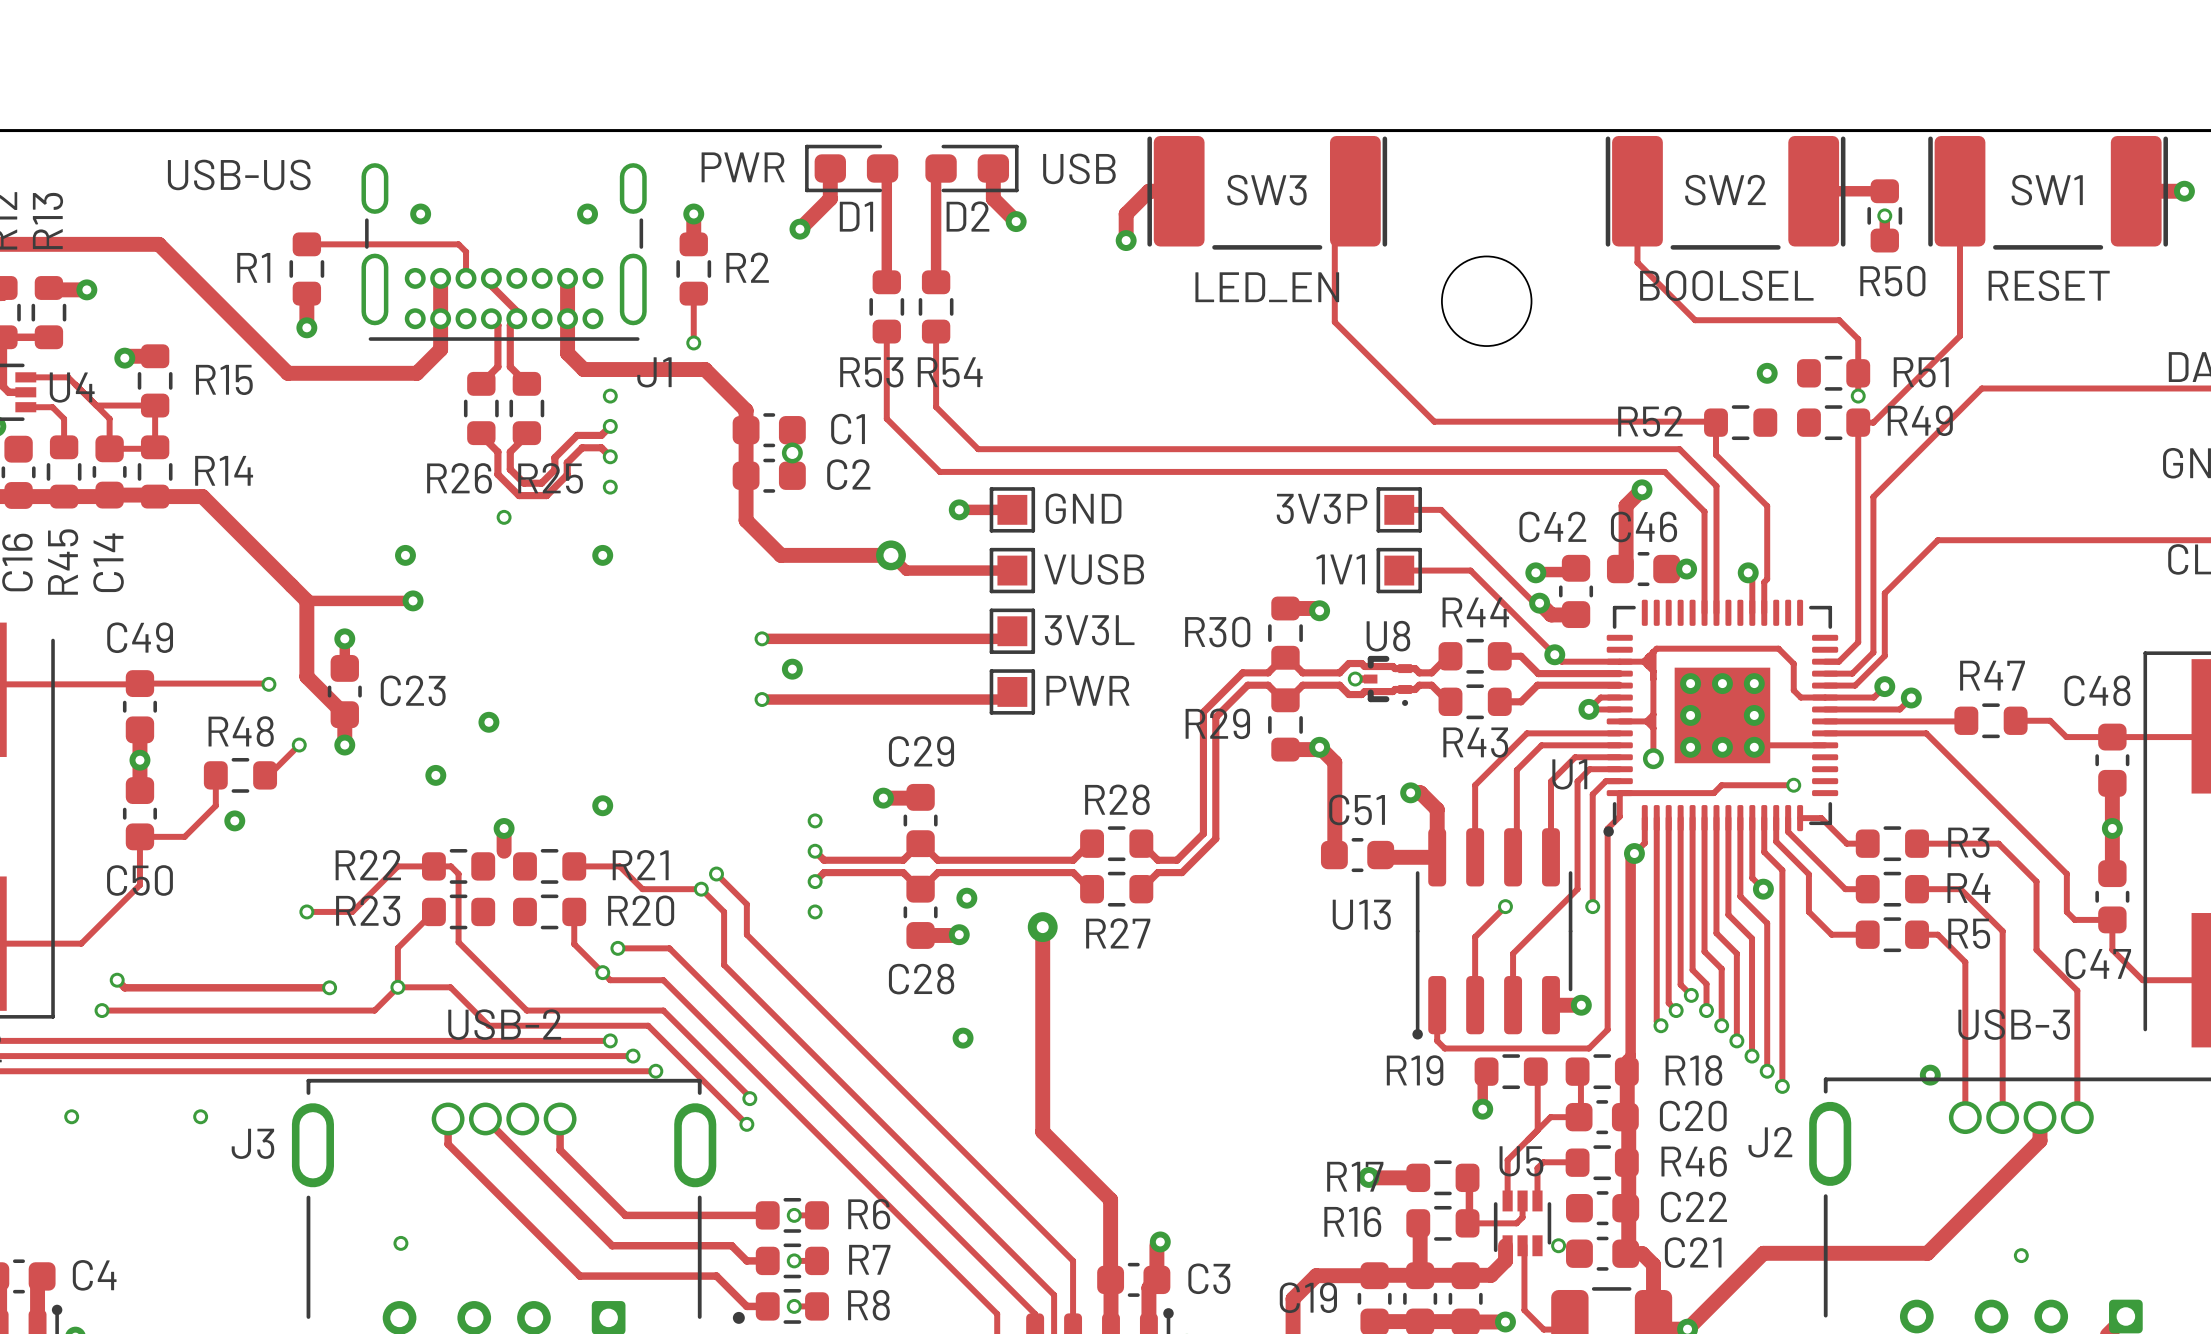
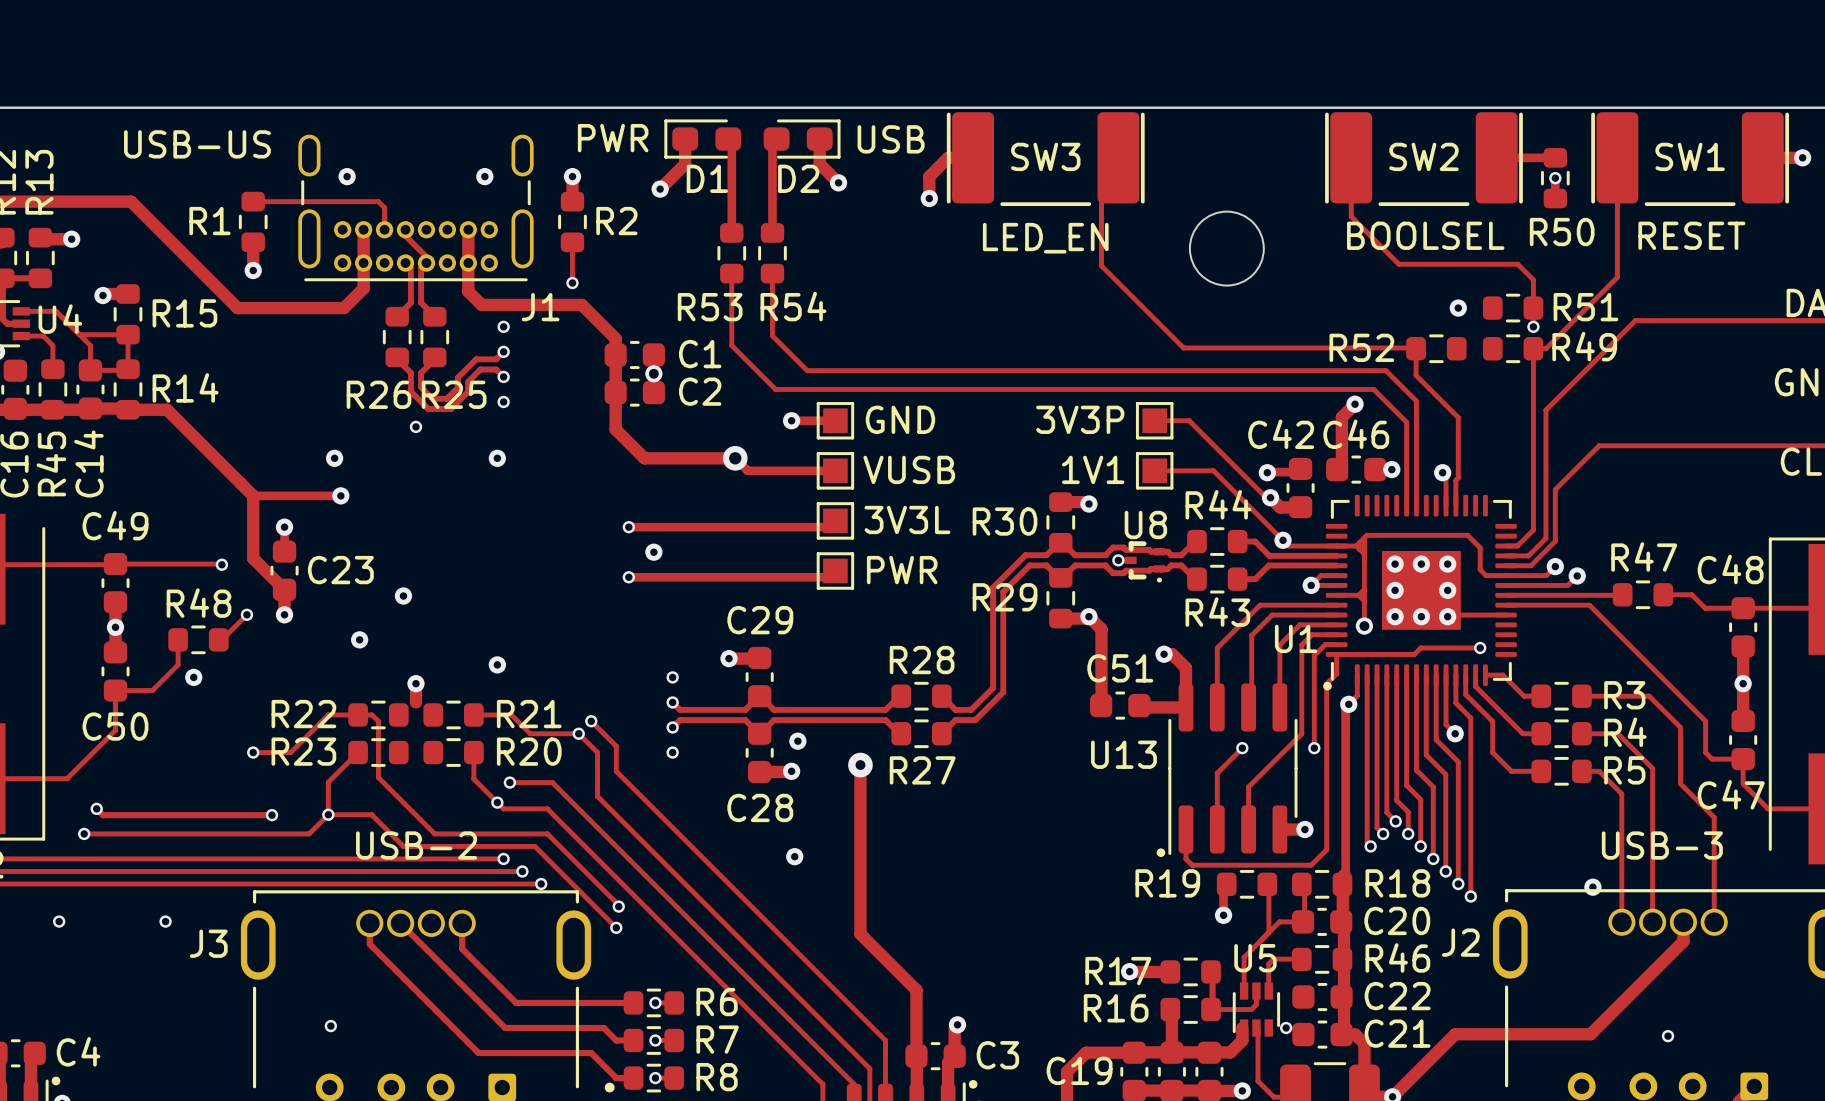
drawing: none -> [1156, 848, 1166, 858]
drawing: [1412, 1029, 1423, 1040] -> none
drawing: [51, 1304, 63, 1316] -> none
drawing: none -> [51, 1076, 61, 1086]
drawing: [1163, 1308, 1174, 1319] -> none
drawing: none -> [968, 1080, 978, 1089]

